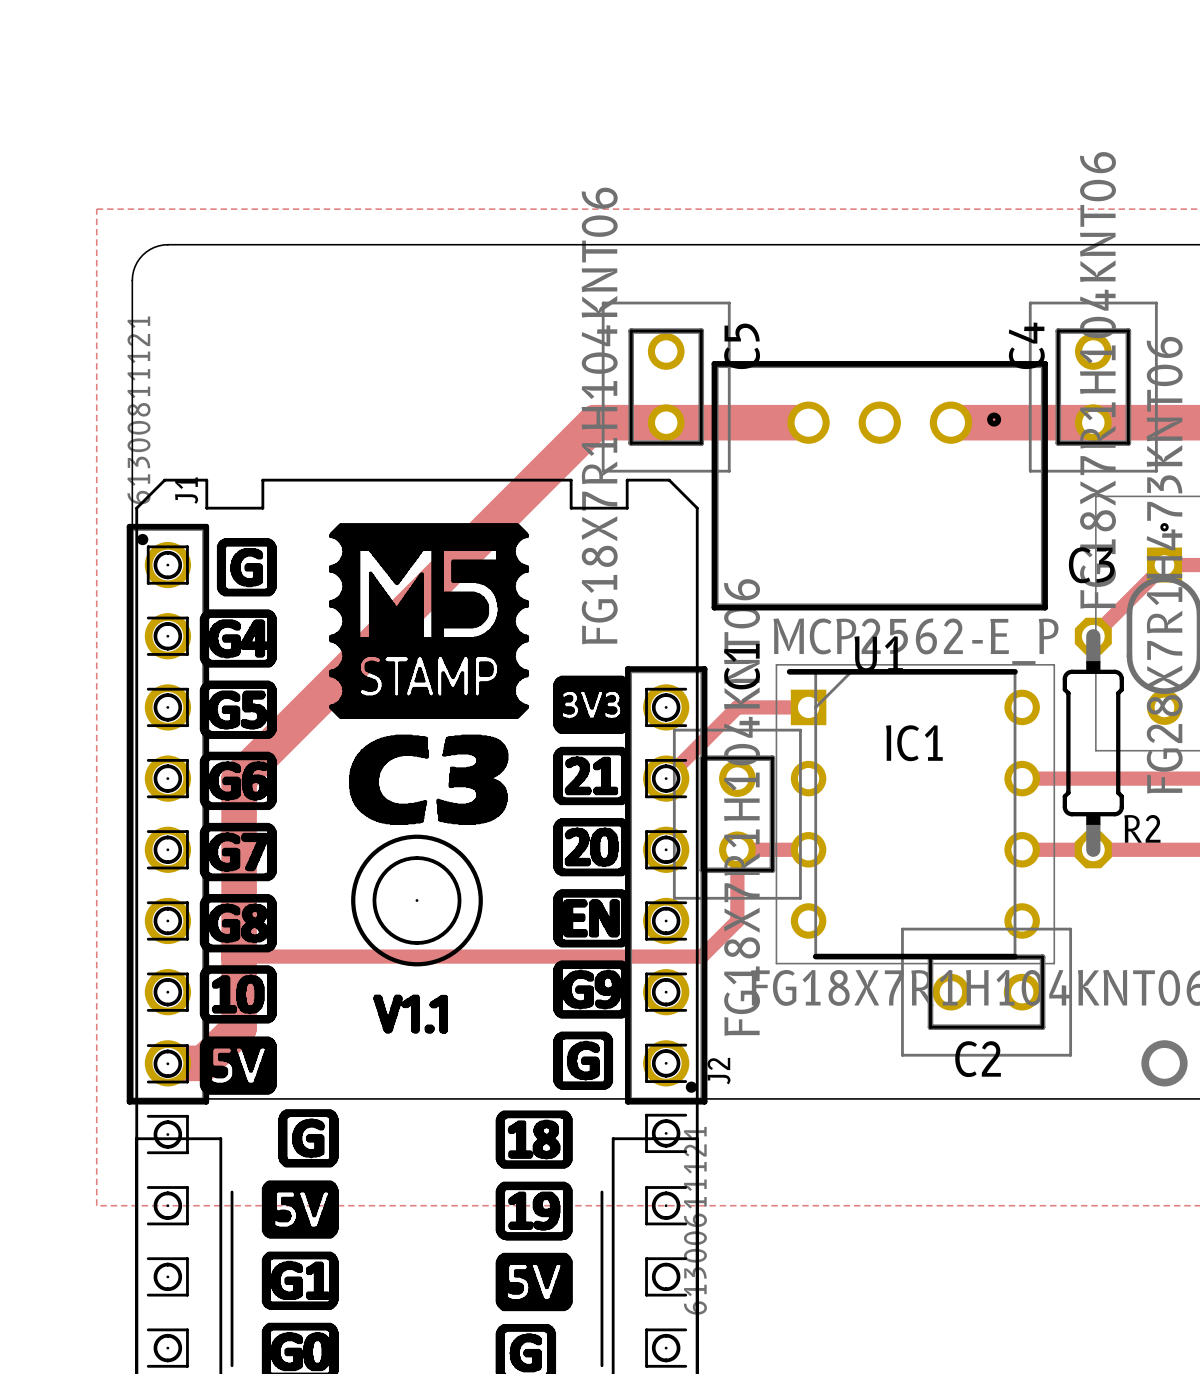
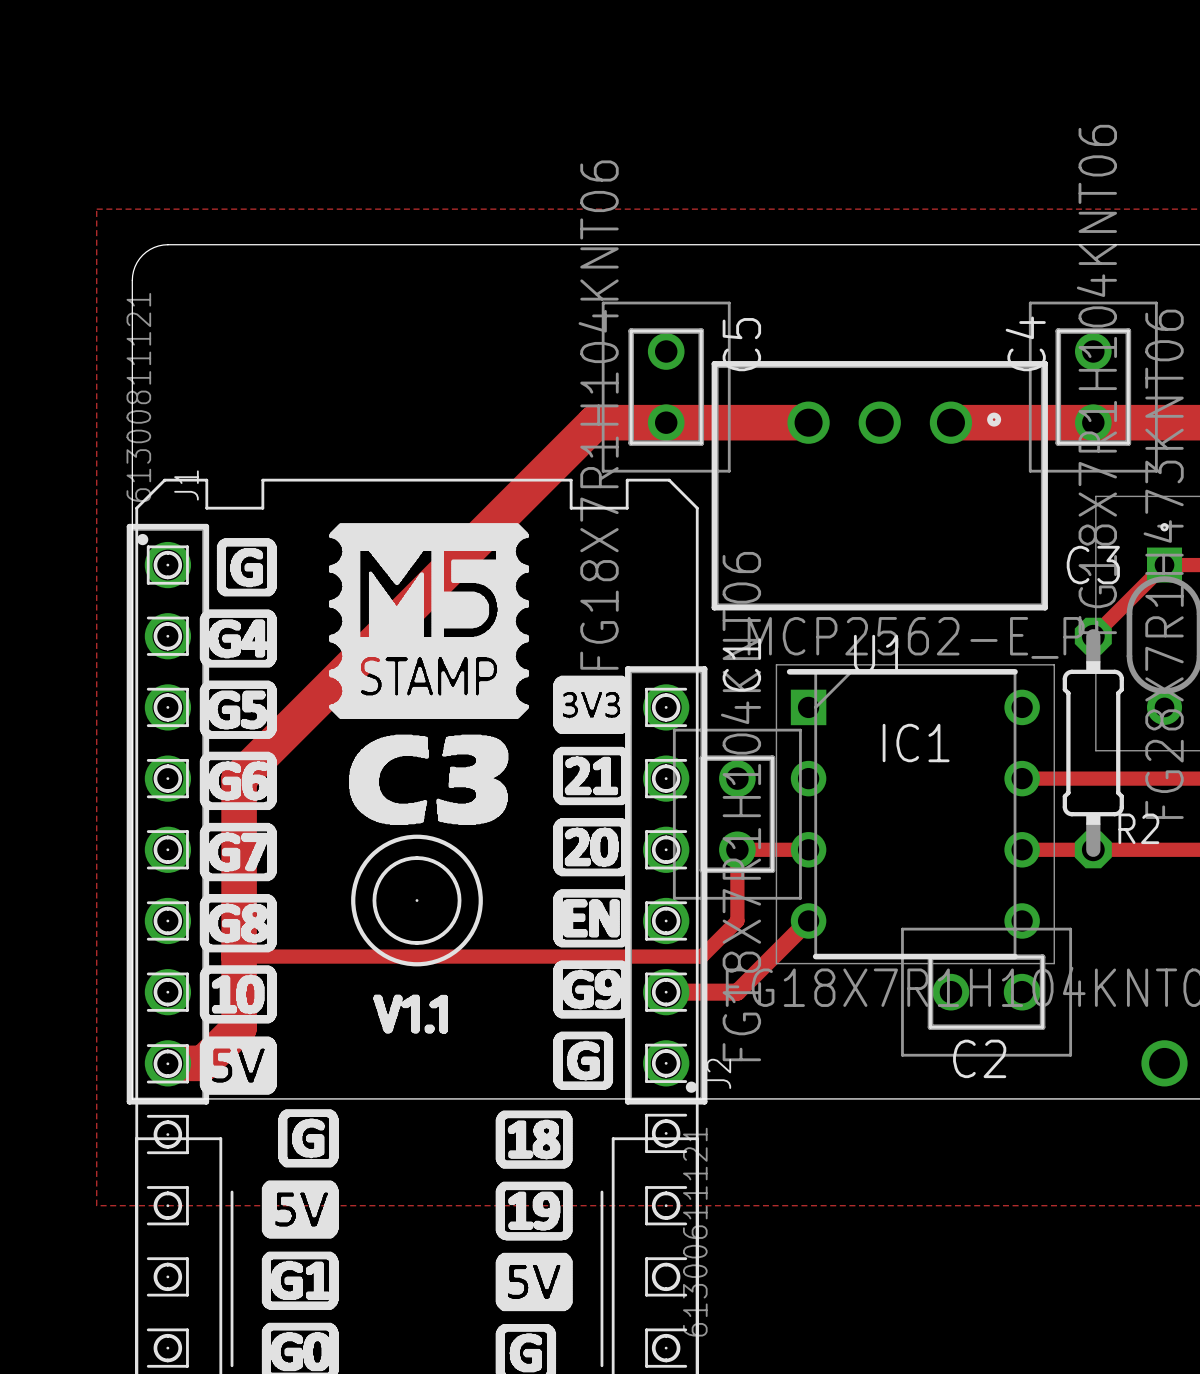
track: (808, 707) (737, 707) (666, 778) -> none
track: none -> (808, 920) (737, 992) (666, 992)

